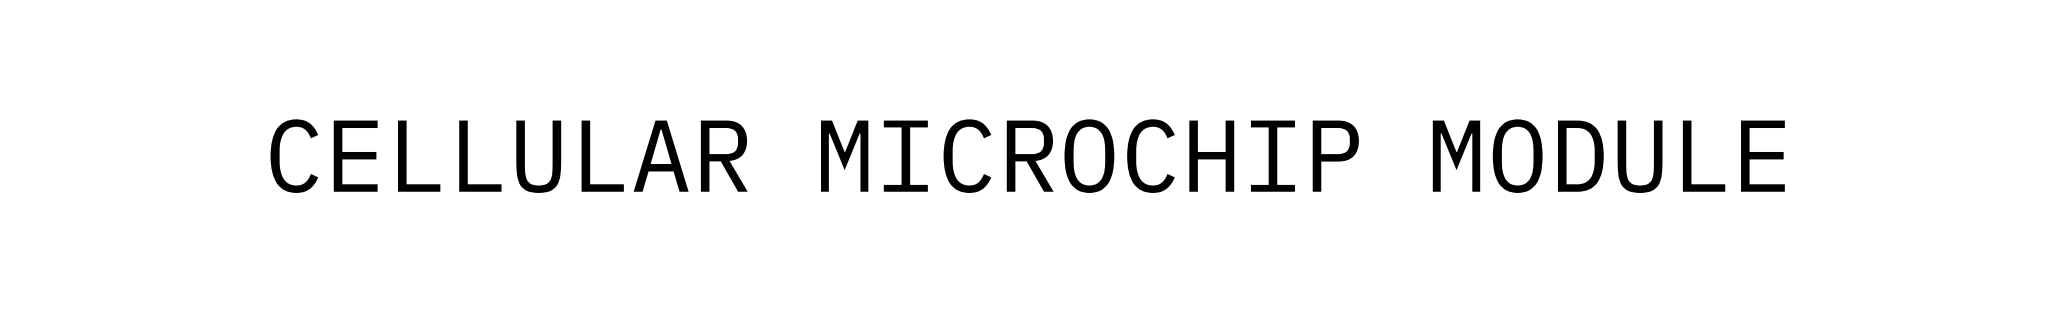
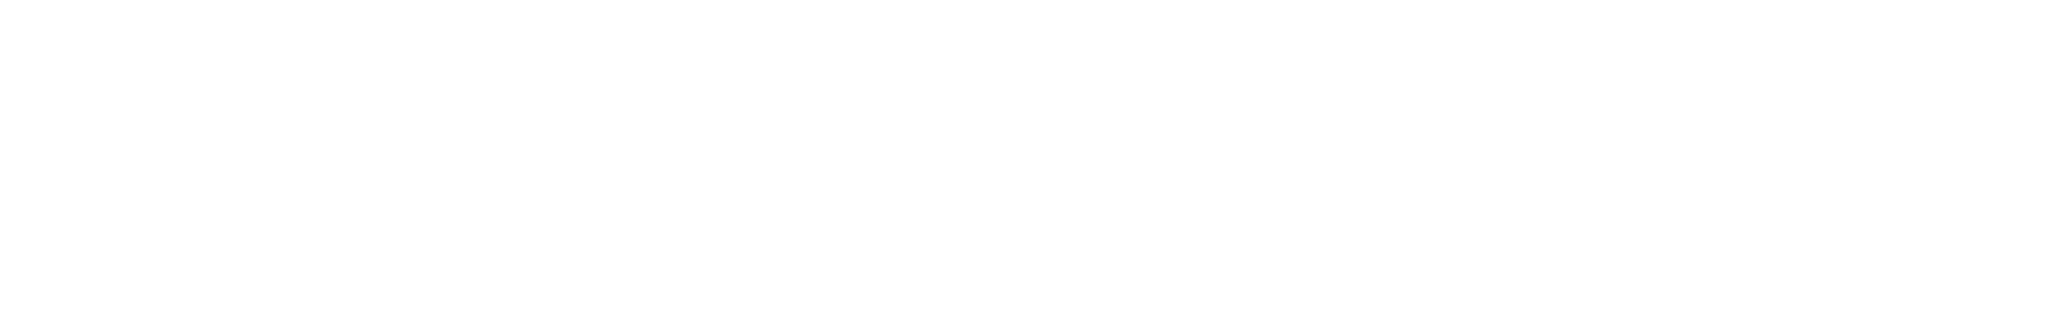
text: CELLULAR MICROCHIP MODULE (1027, 156) -> none

